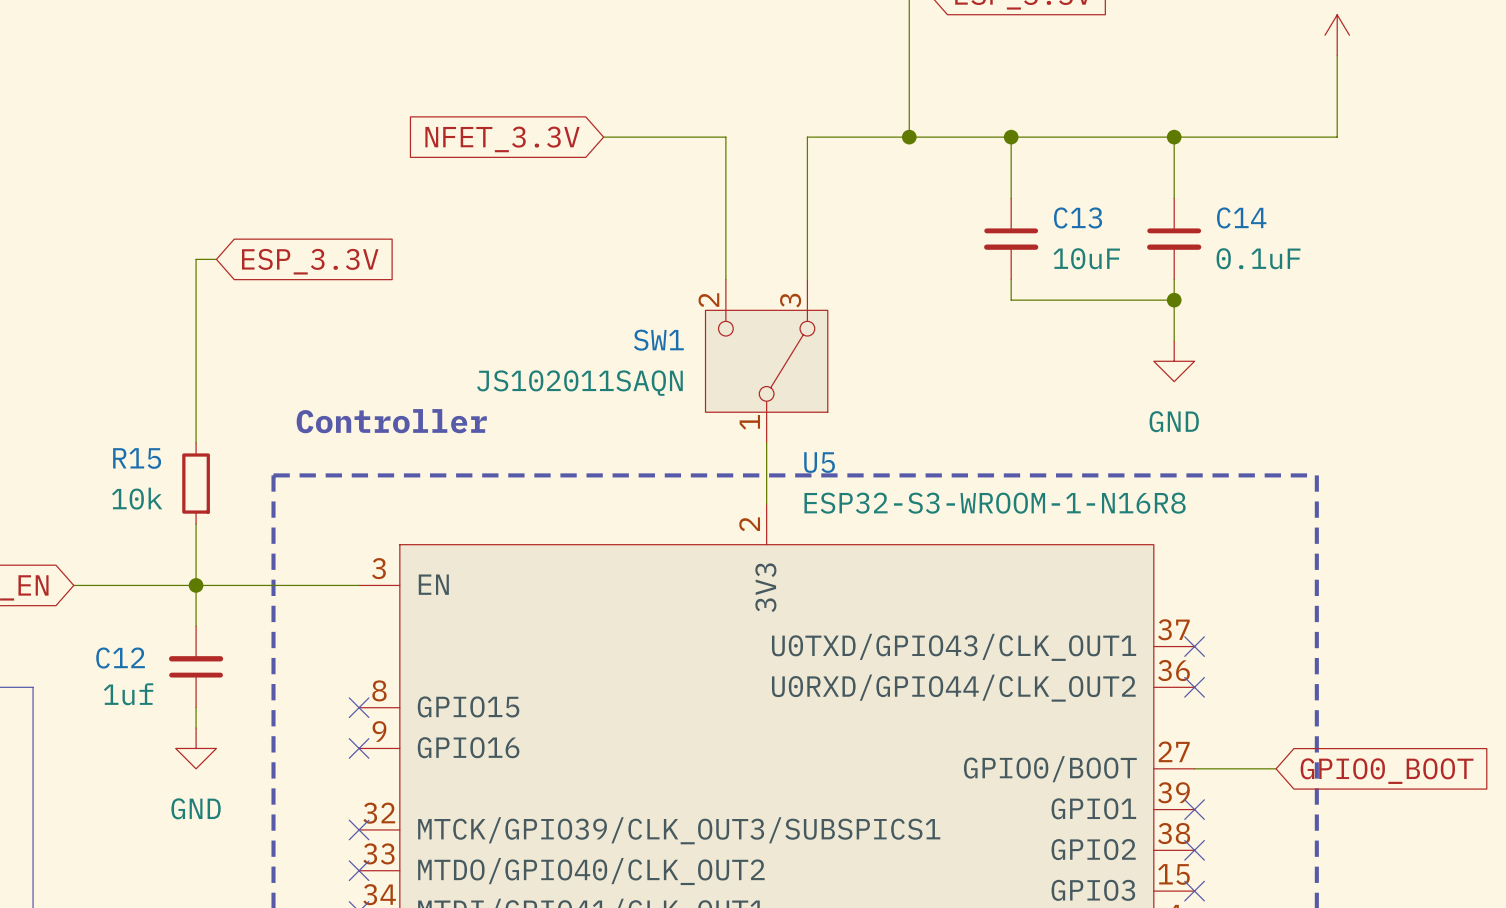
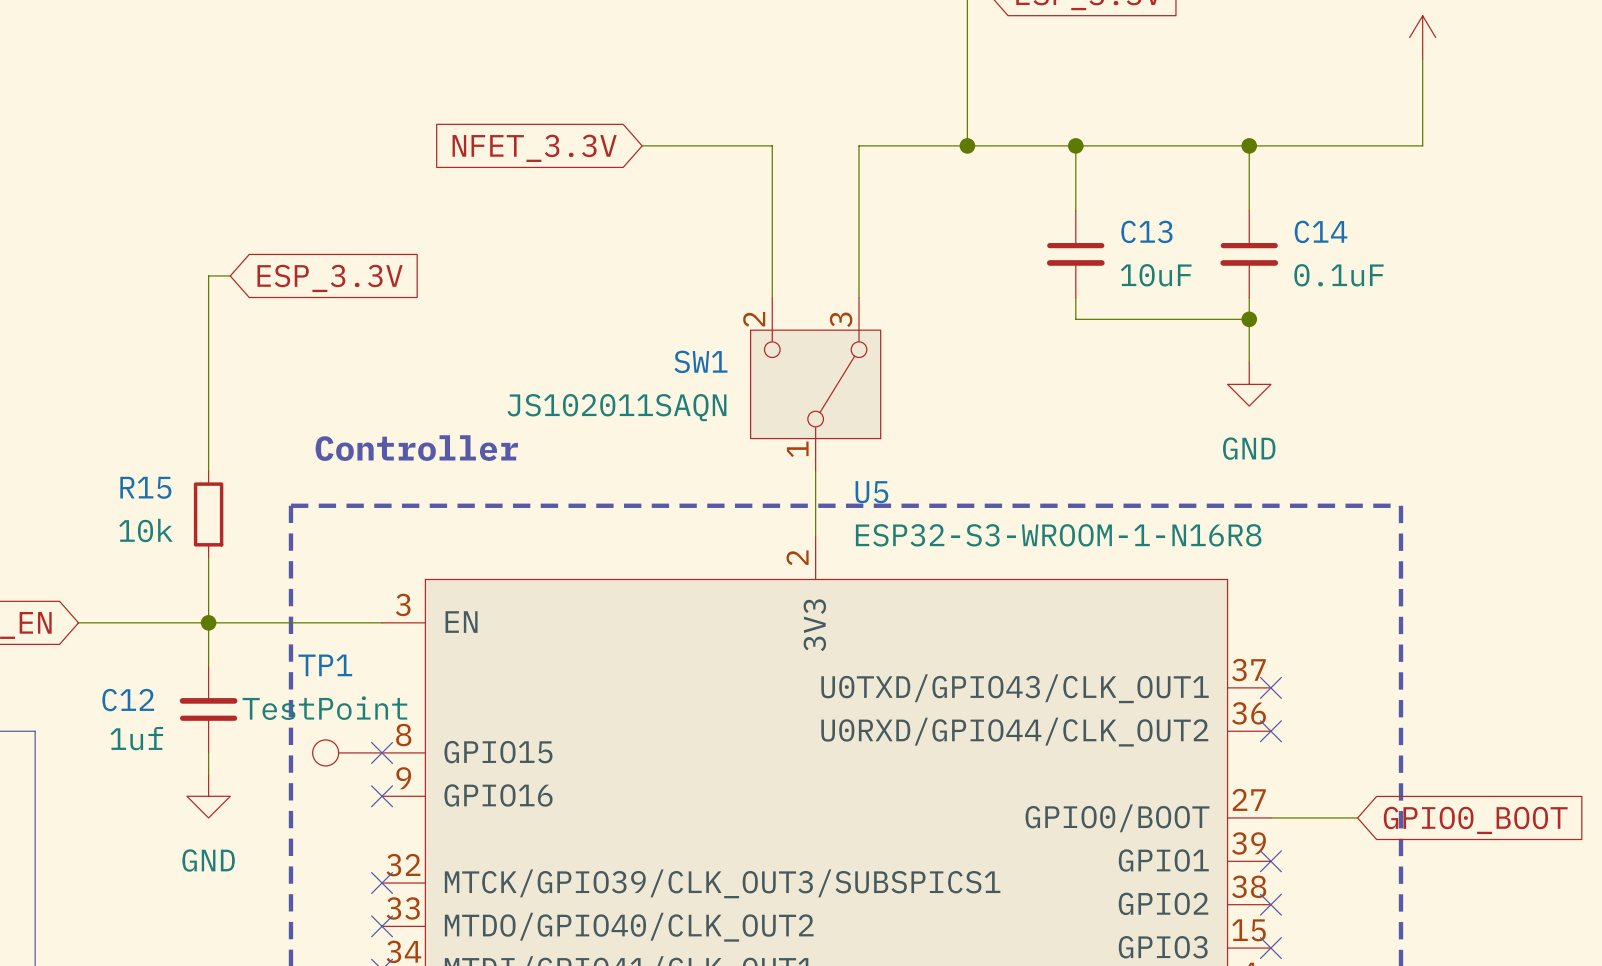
TP1: none -> TestPoint (347, 752)

